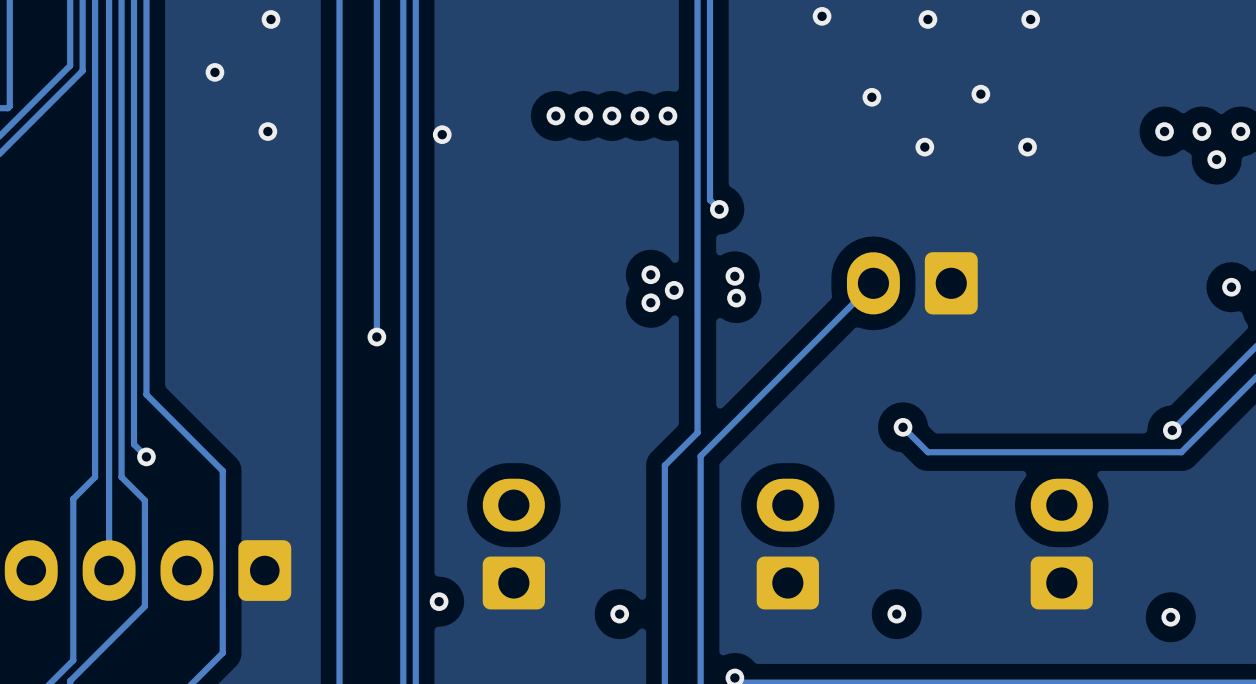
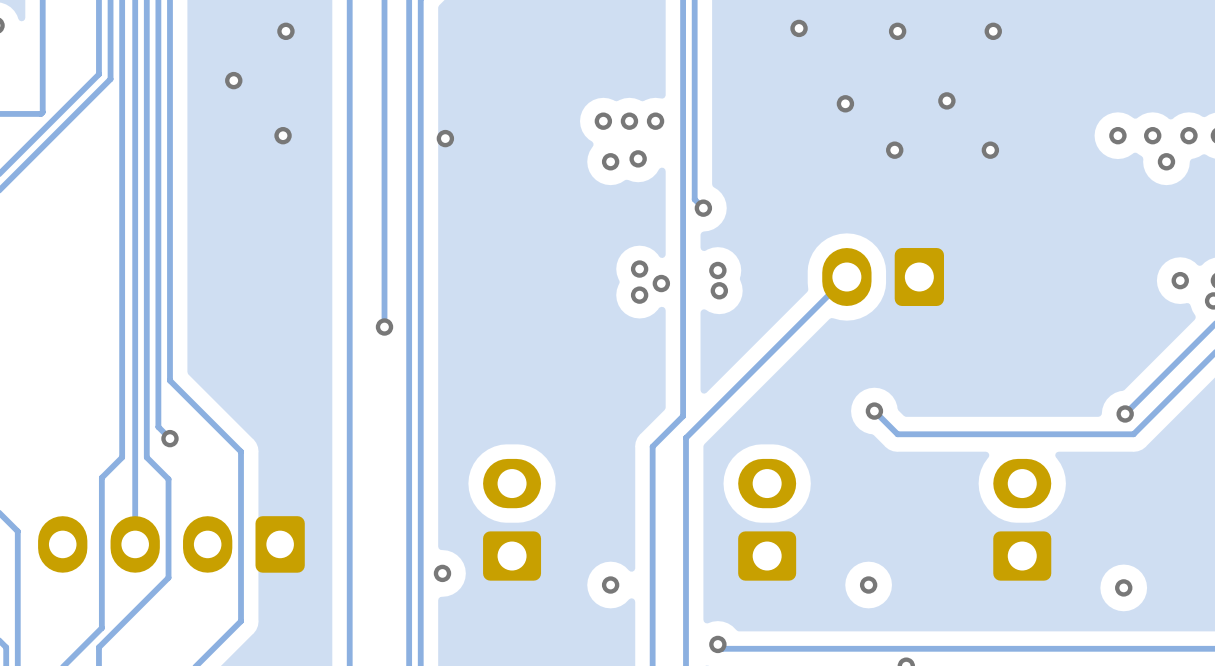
via: (555, 115) -> none
via: (583, 115) -> none
via: none -> (638, 158)
via: none -> (610, 161)

